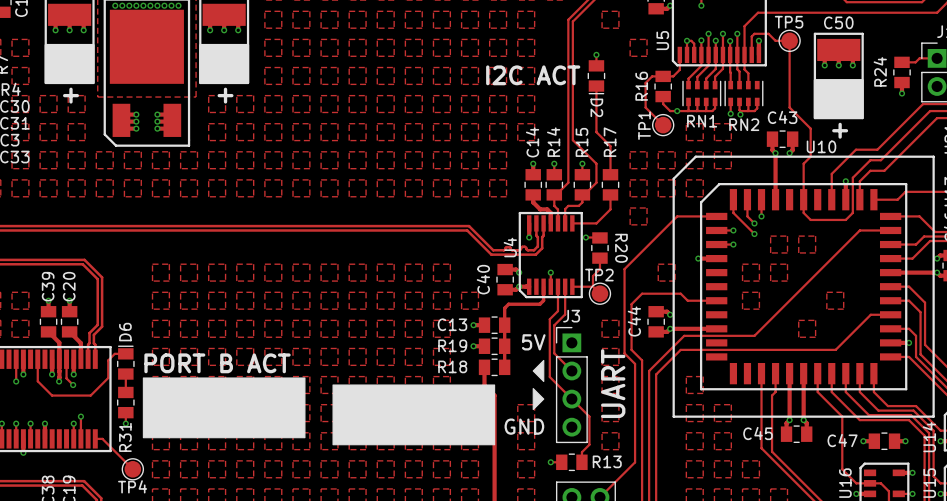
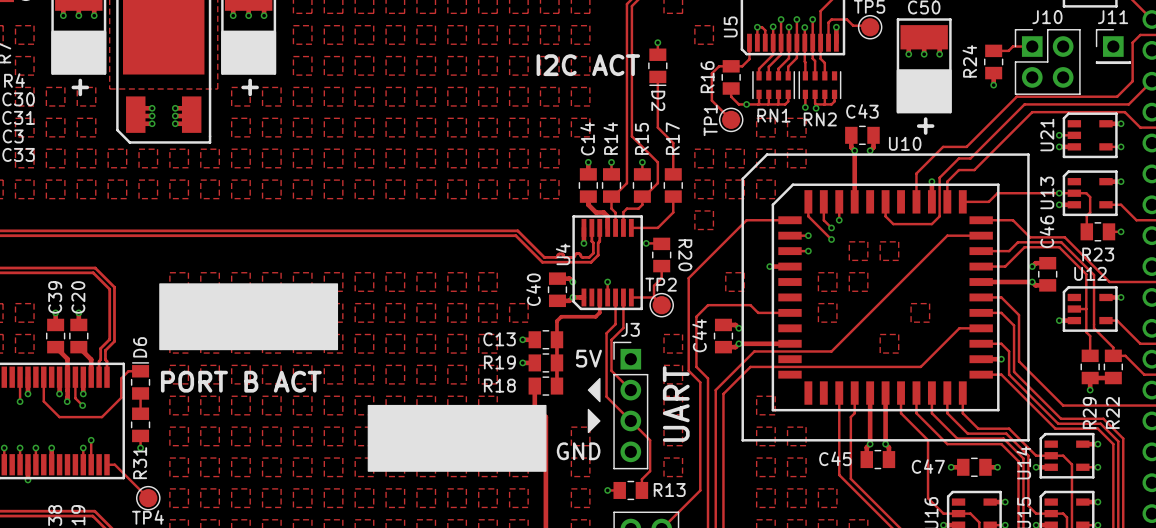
track: (774, 39) (789, 40) (789, 107) (810, 128) (810, 156) (803, 163) (803, 199) -> (853, 25) (867, 25)
drawing position: (224, 407) -> (248, 316)

